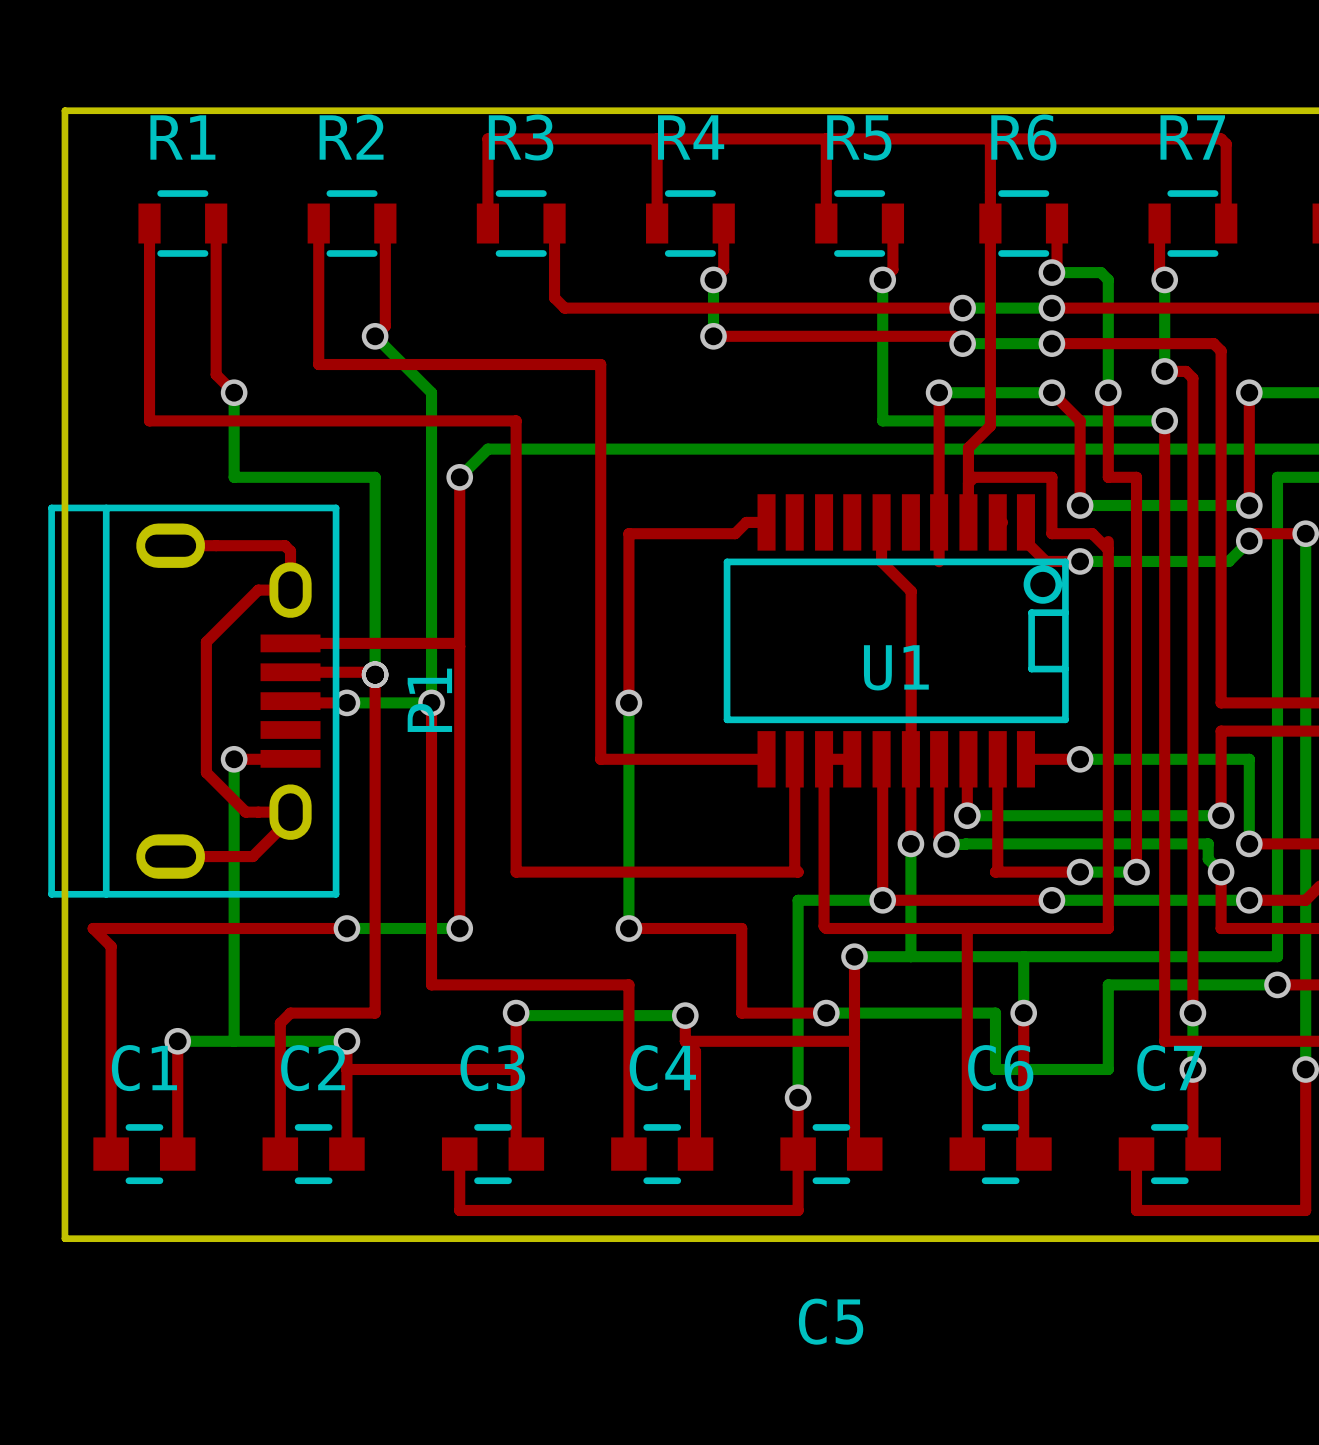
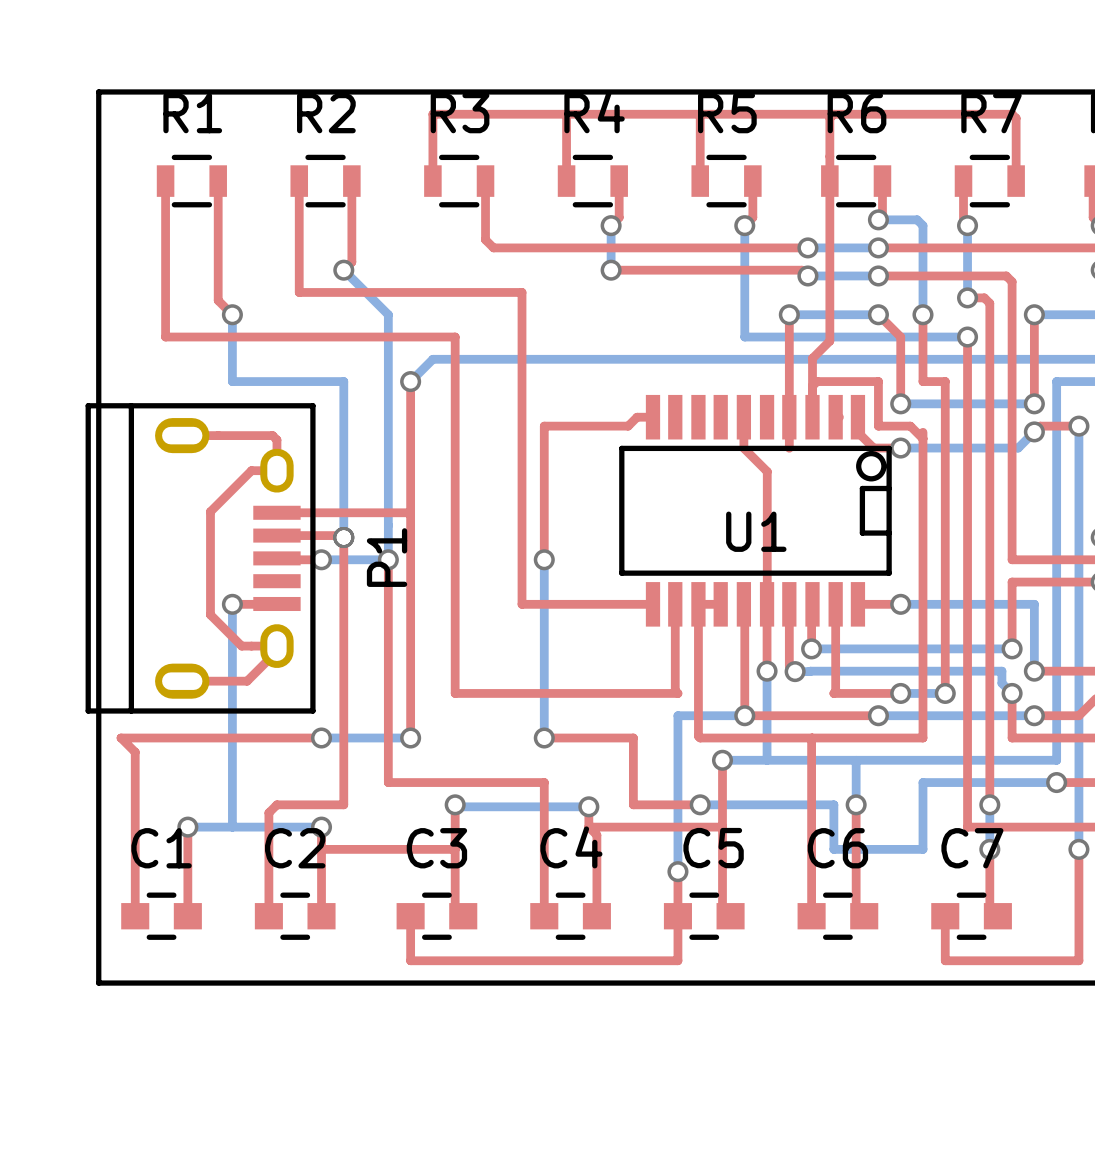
C5 name position: C5 (831, 1321) -> C5 (713, 848)

